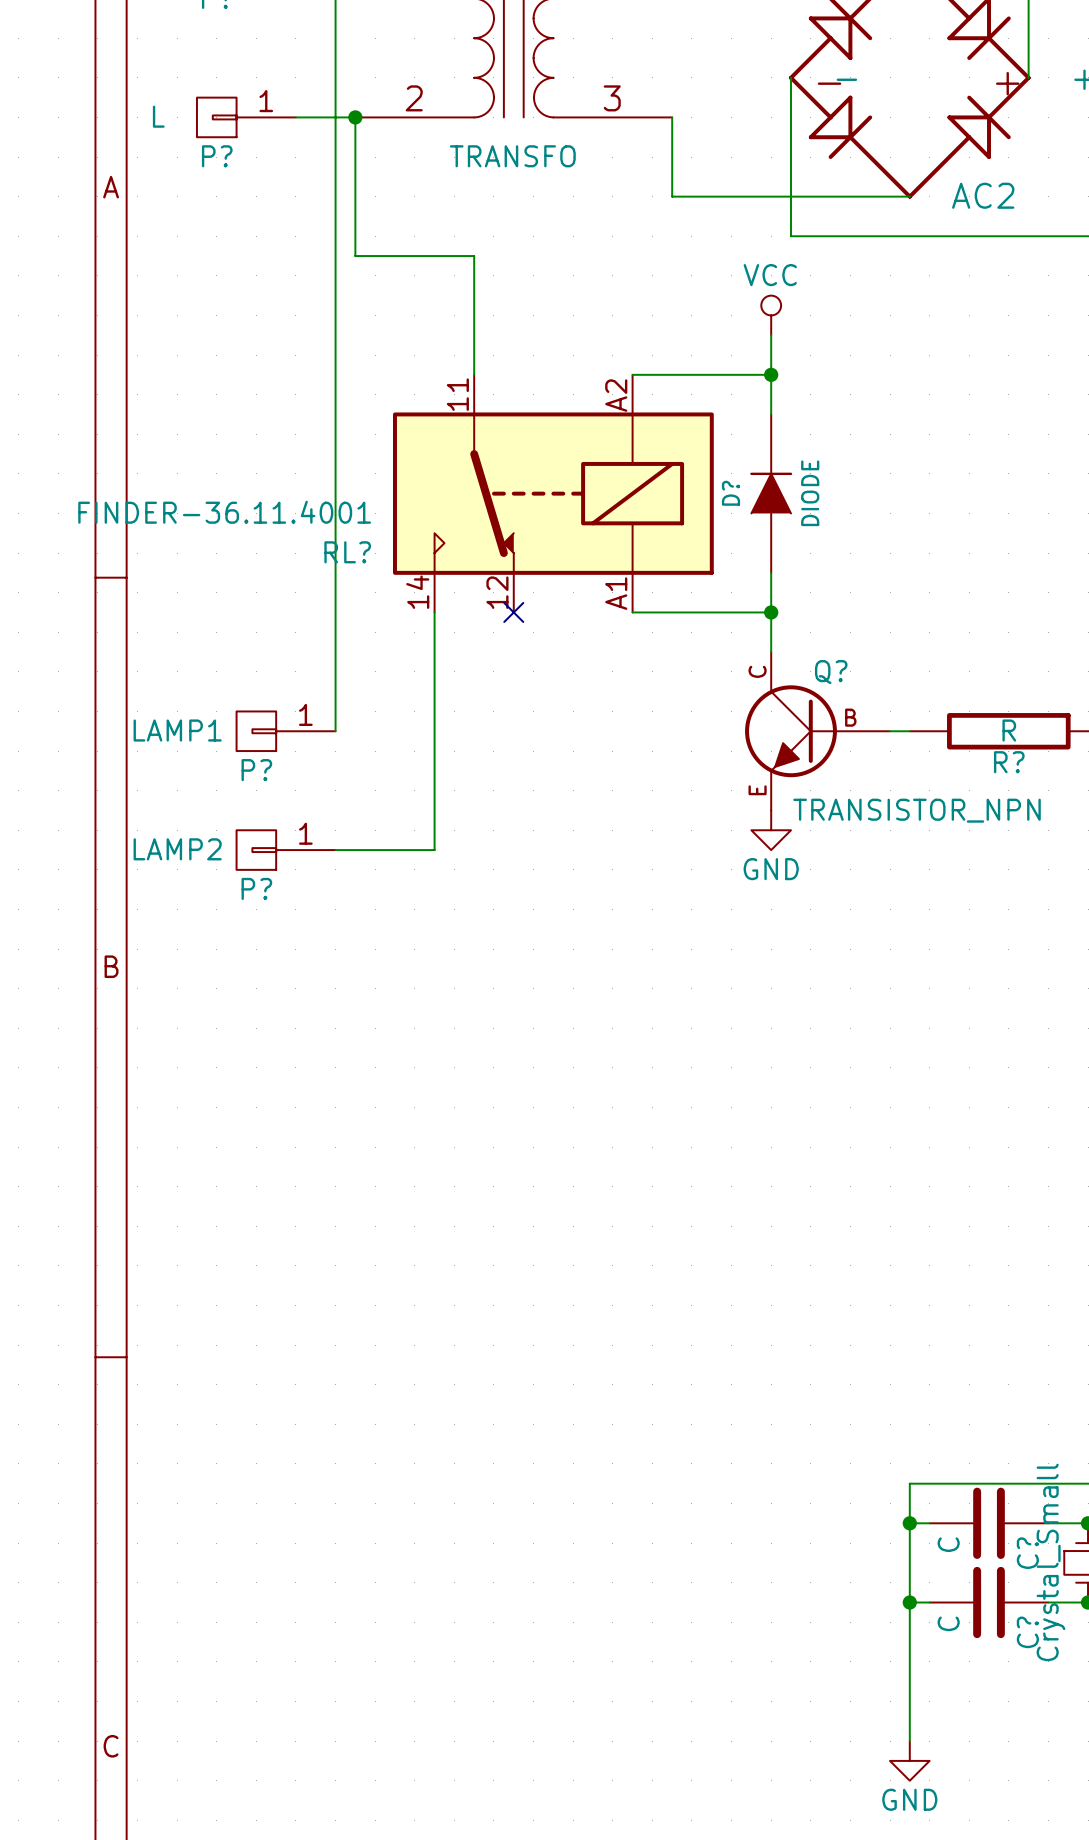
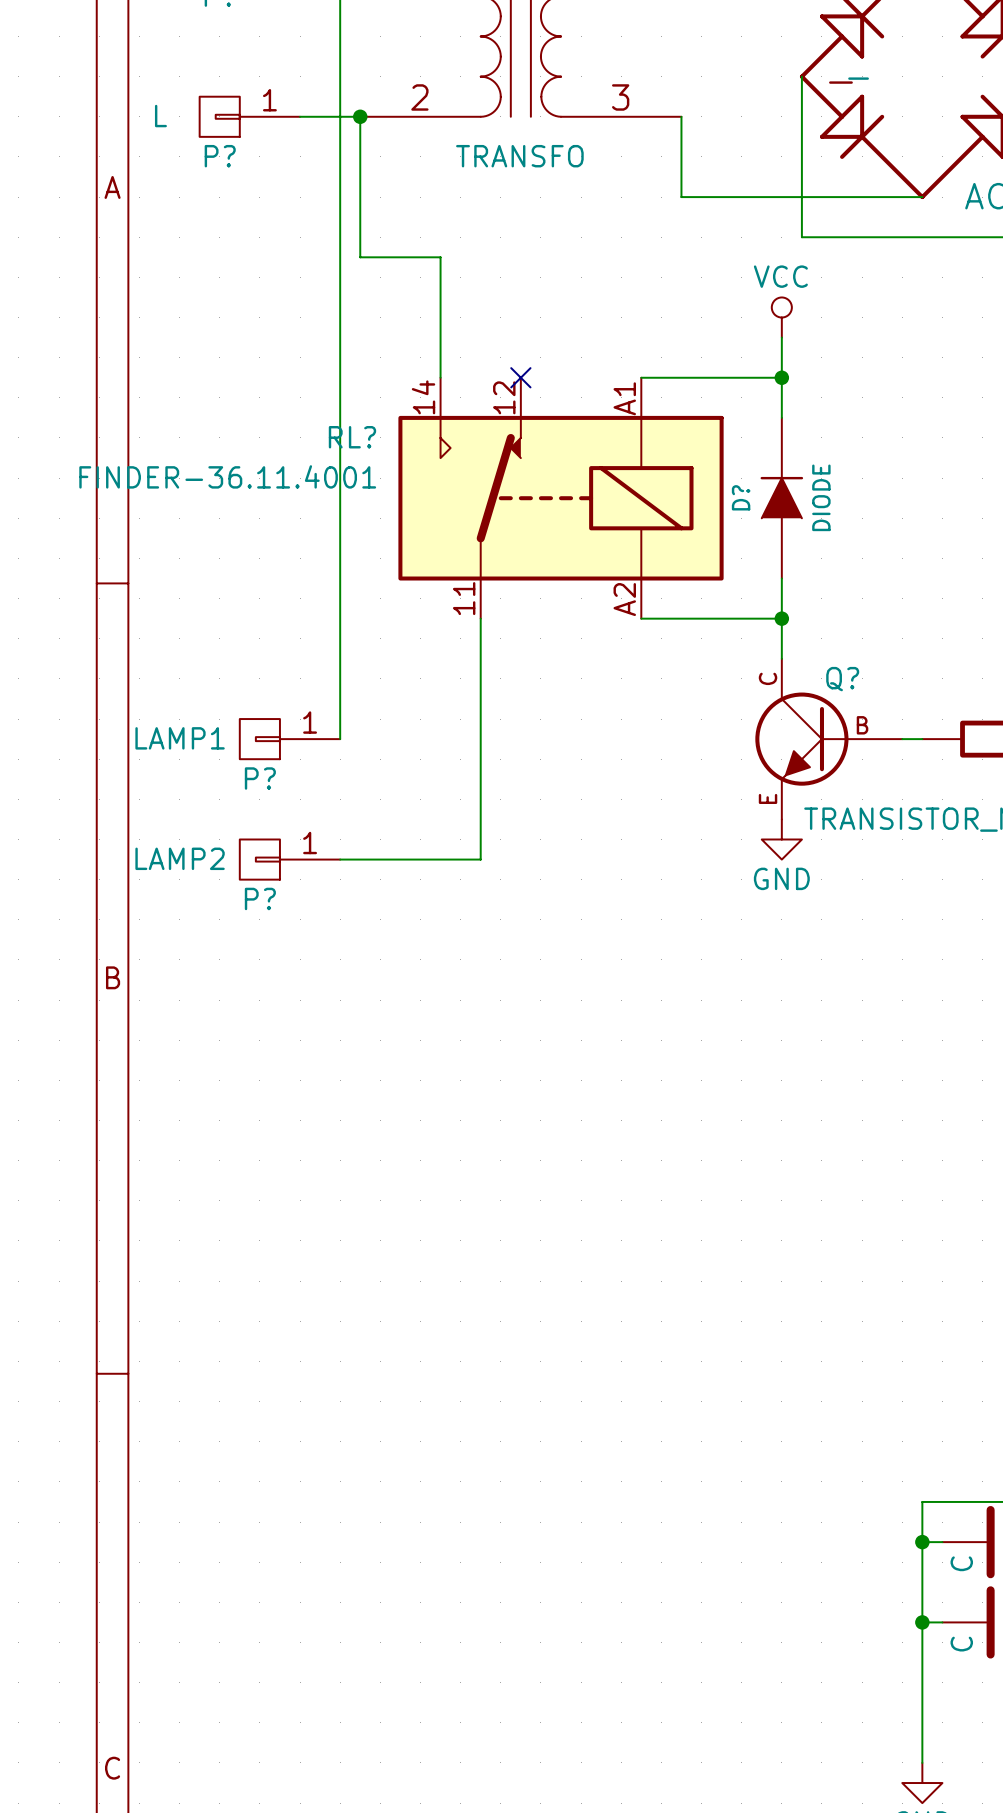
wire: (434, 256) (474, 256) (474, 374) -> (440, 257) (440, 377)
no-connect mark: none -> (520, 377)
RL? flip: as is (553, 493) -> up-down (561, 498)
wire: (434, 612) (434, 850) -> (480, 618) (480, 859) (440, 859)
no-connect mark: (513, 612) -> none

